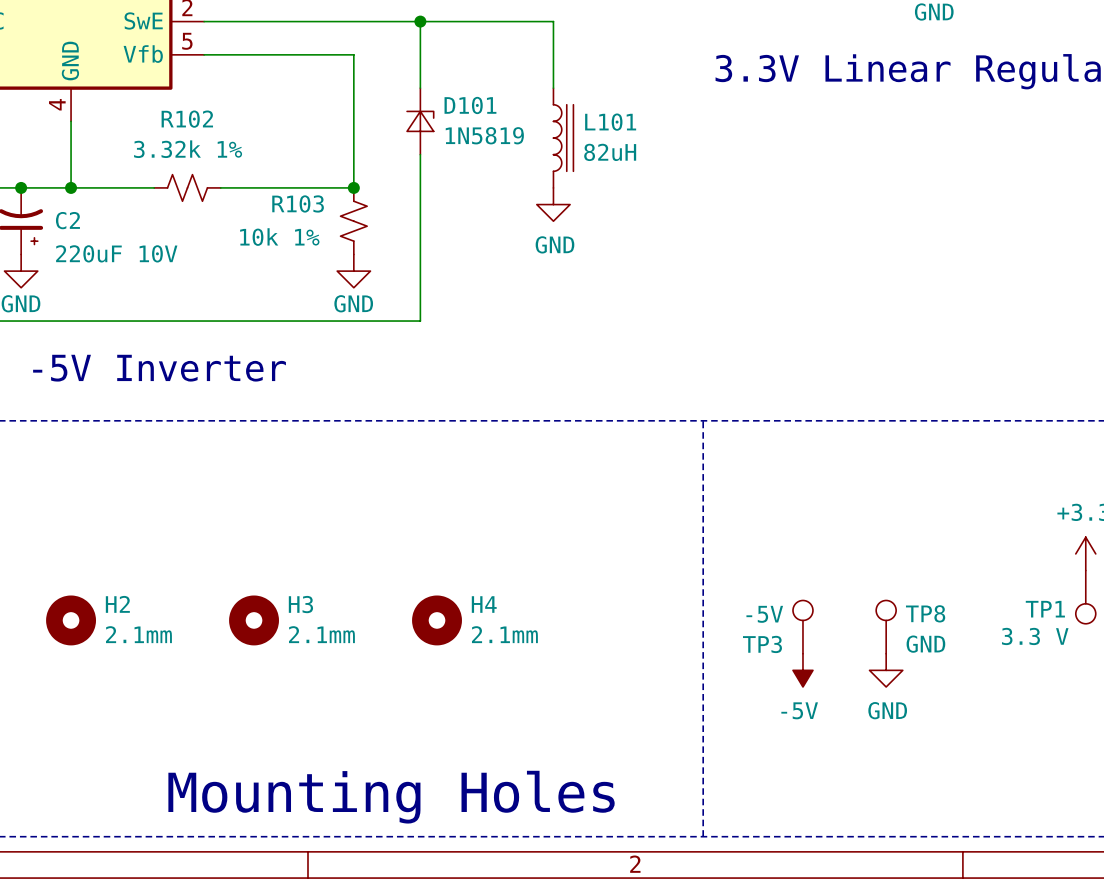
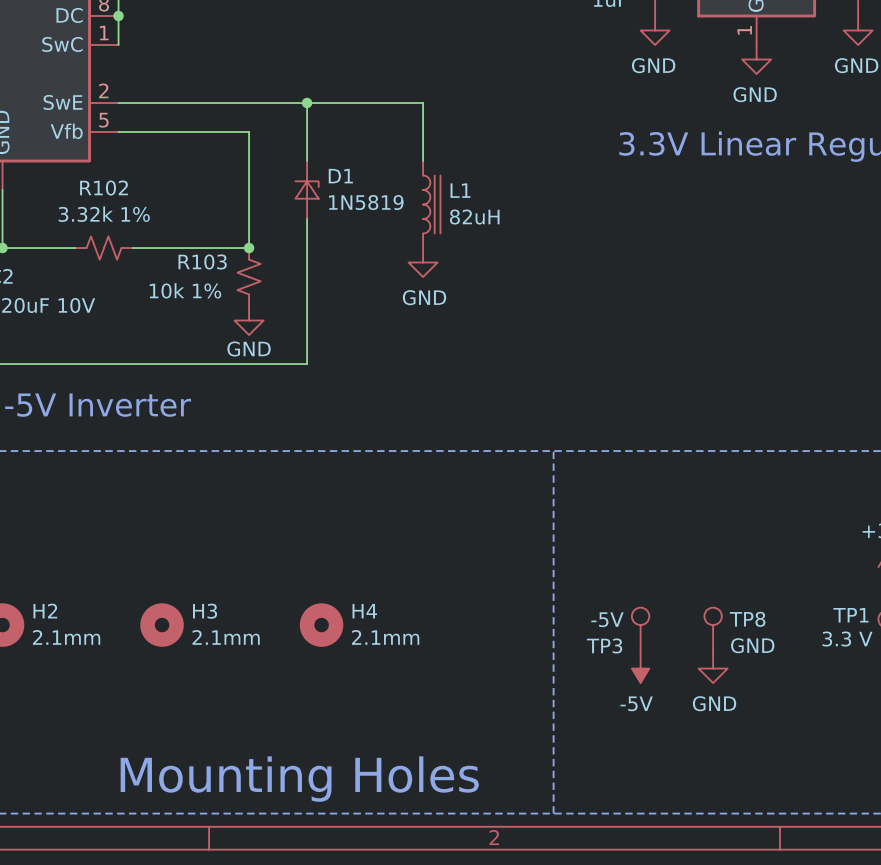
D101 name: D101 (470, 105) -> D1 (340, 176)
L101 name: L101 (610, 122) -> L1 (460, 190)

